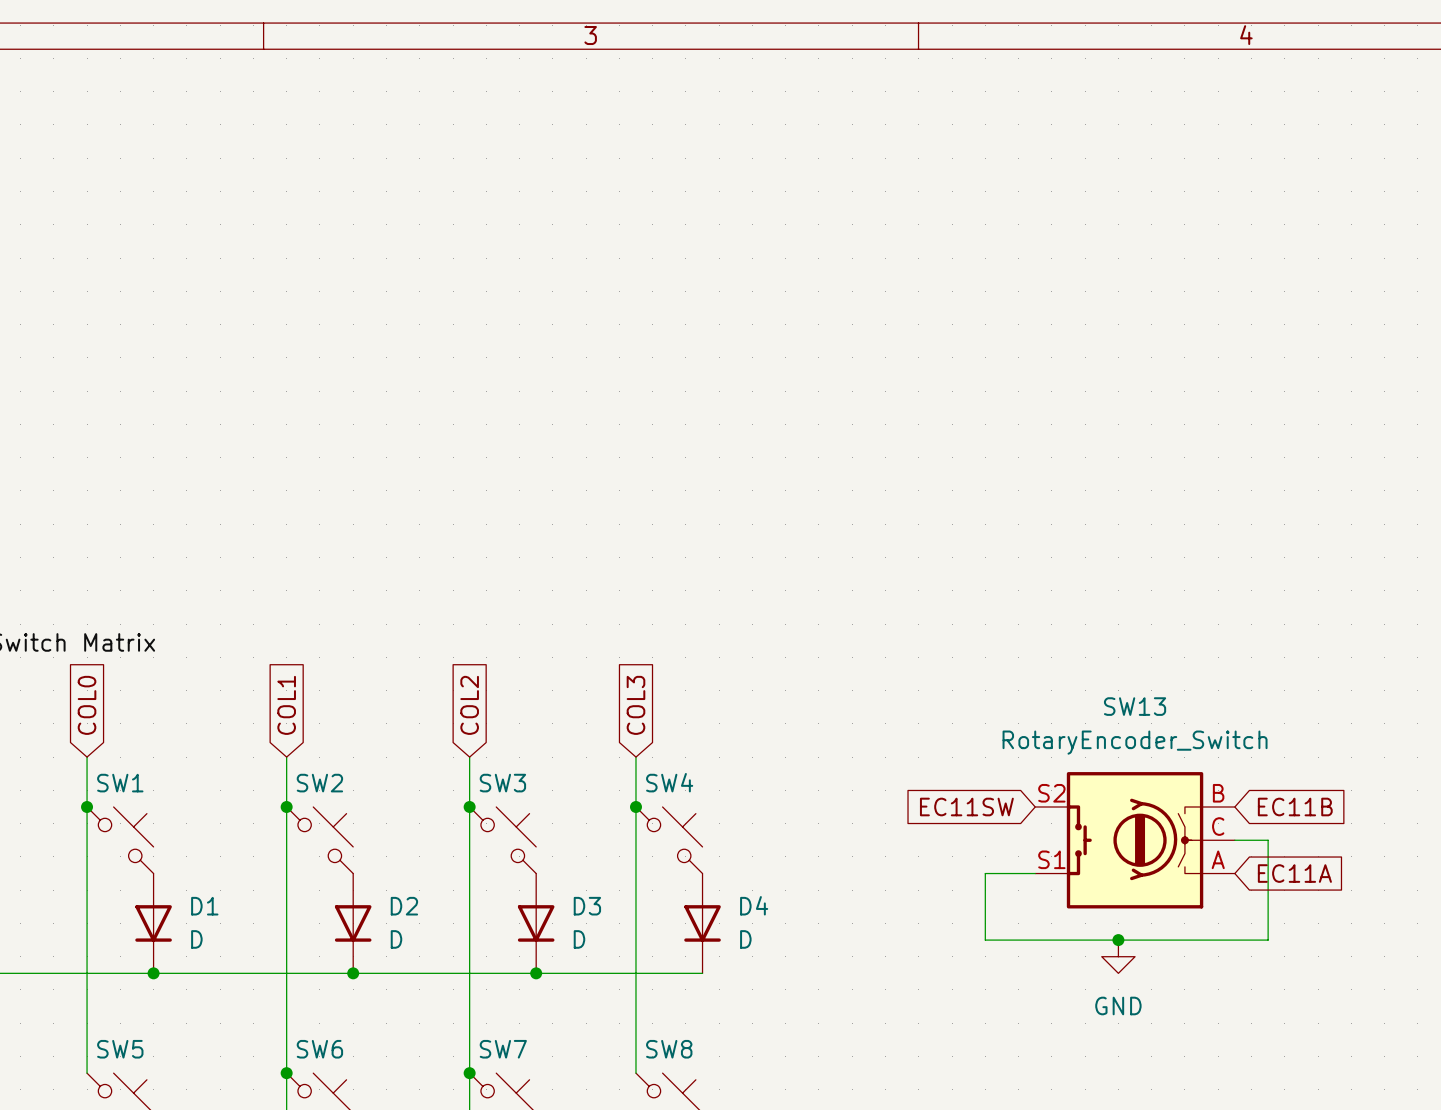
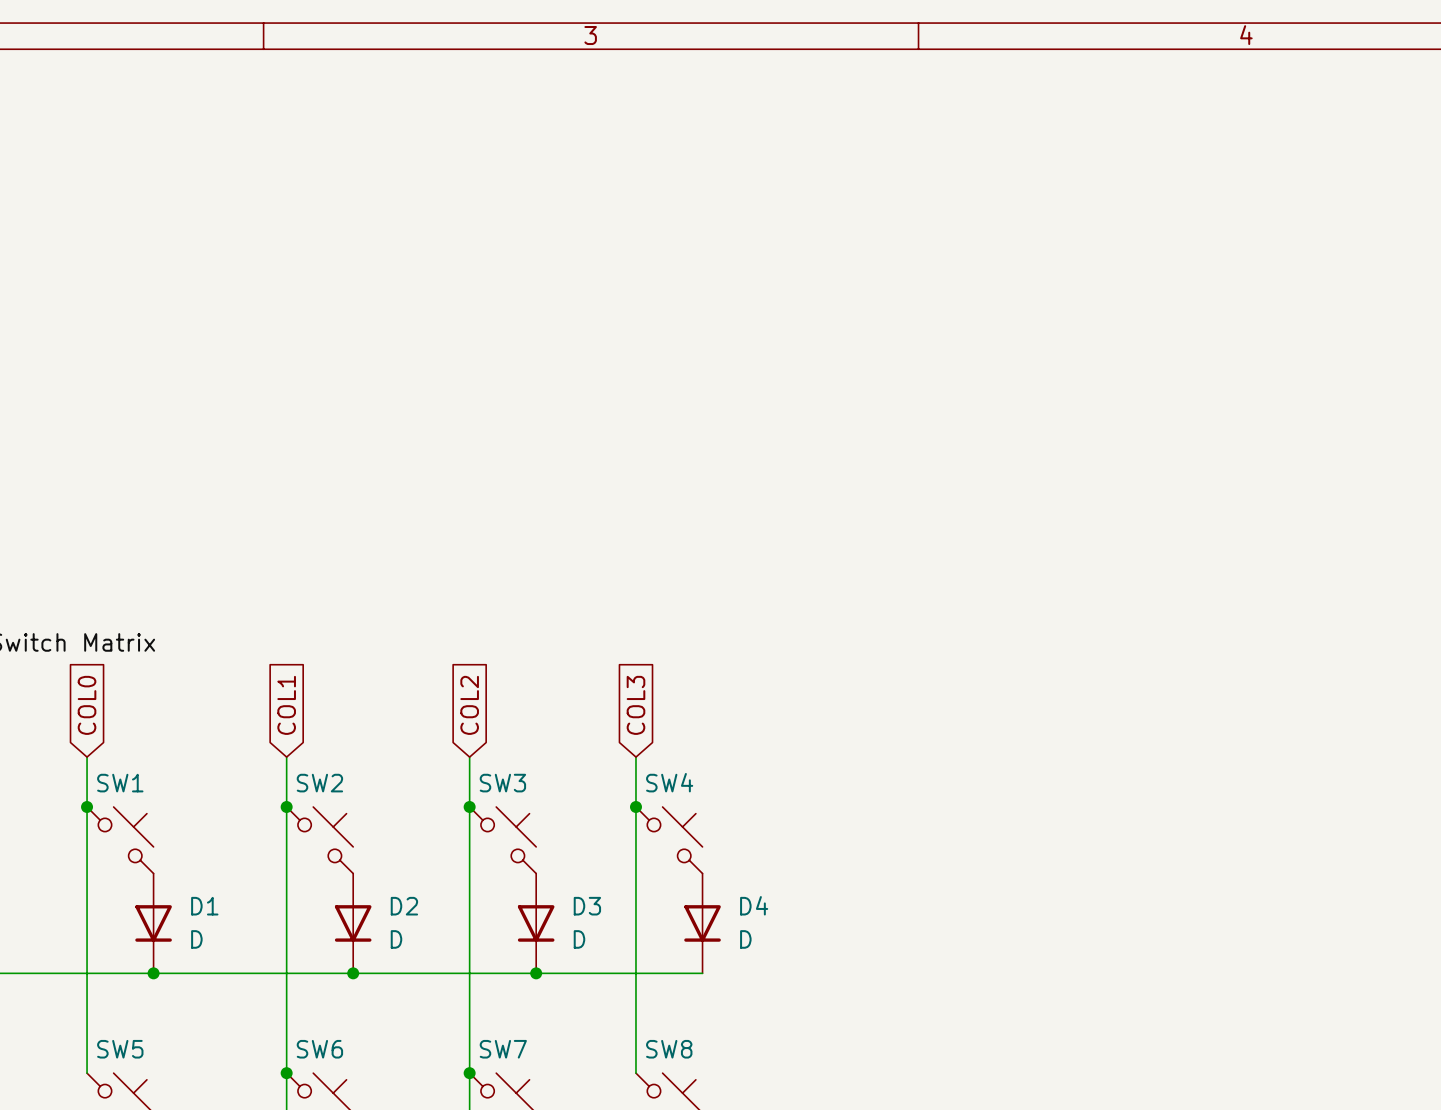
global label: EC11SW (966, 806) -> none
global label: EC11B (1295, 806) -> none
SW13: RotaryEncoder_Switch (1135, 840) -> none
wire: (1234, 840) (1268, 840) (1268, 940) (985, 940) (985, 873) (1035, 873) -> none
global label: EC11A (1294, 873) -> none
junction: (1118, 940) -> none
power symbol: GND (1118, 956) -> none

